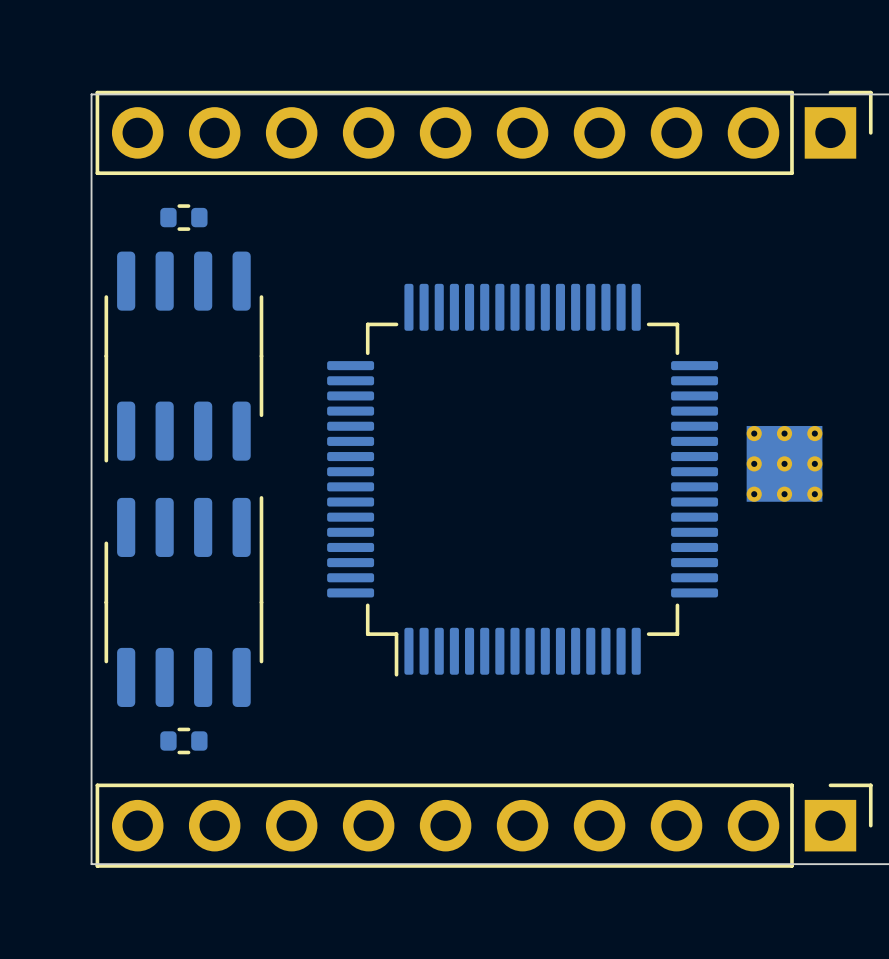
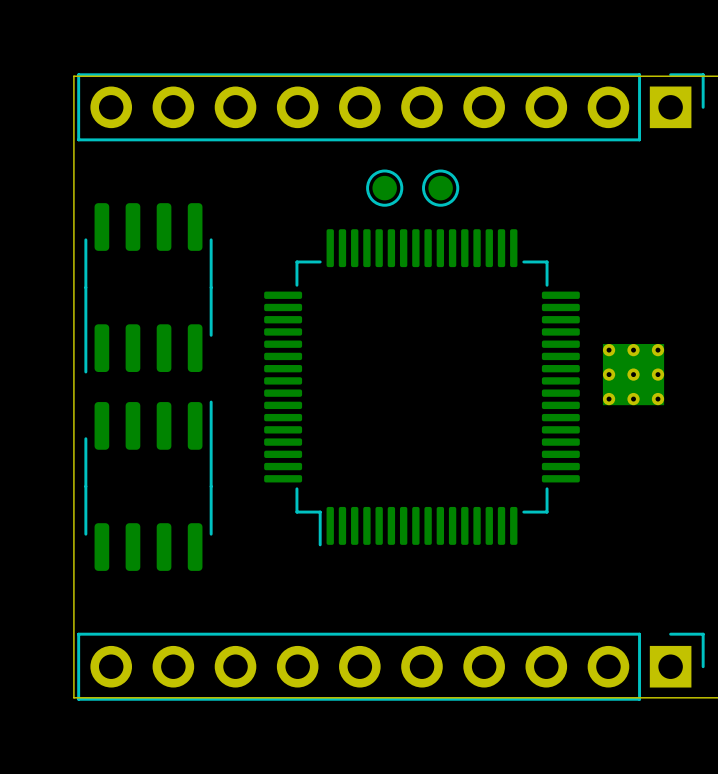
part: (183, 217) -> none
part: none -> (384, 188)
part: none -> (440, 188)
part: (183, 740) -> none

